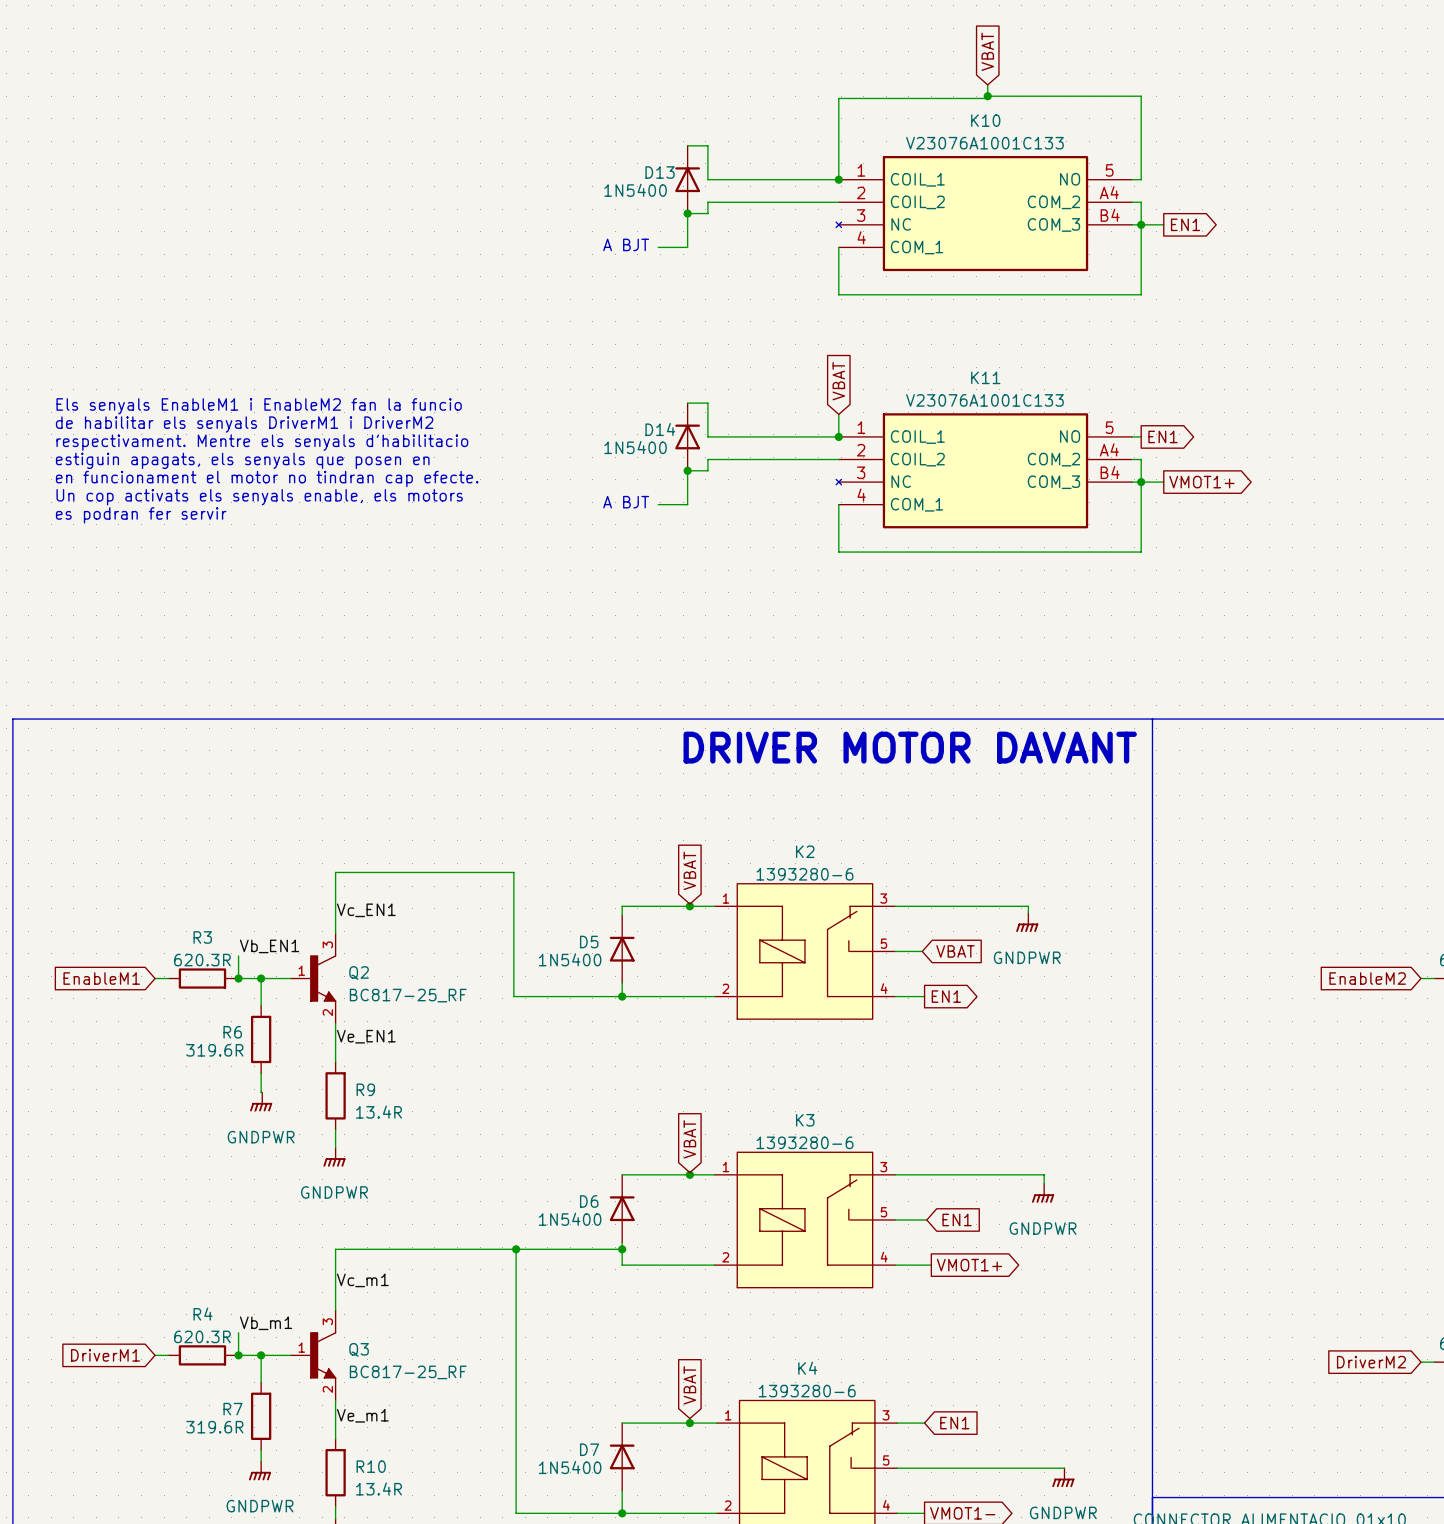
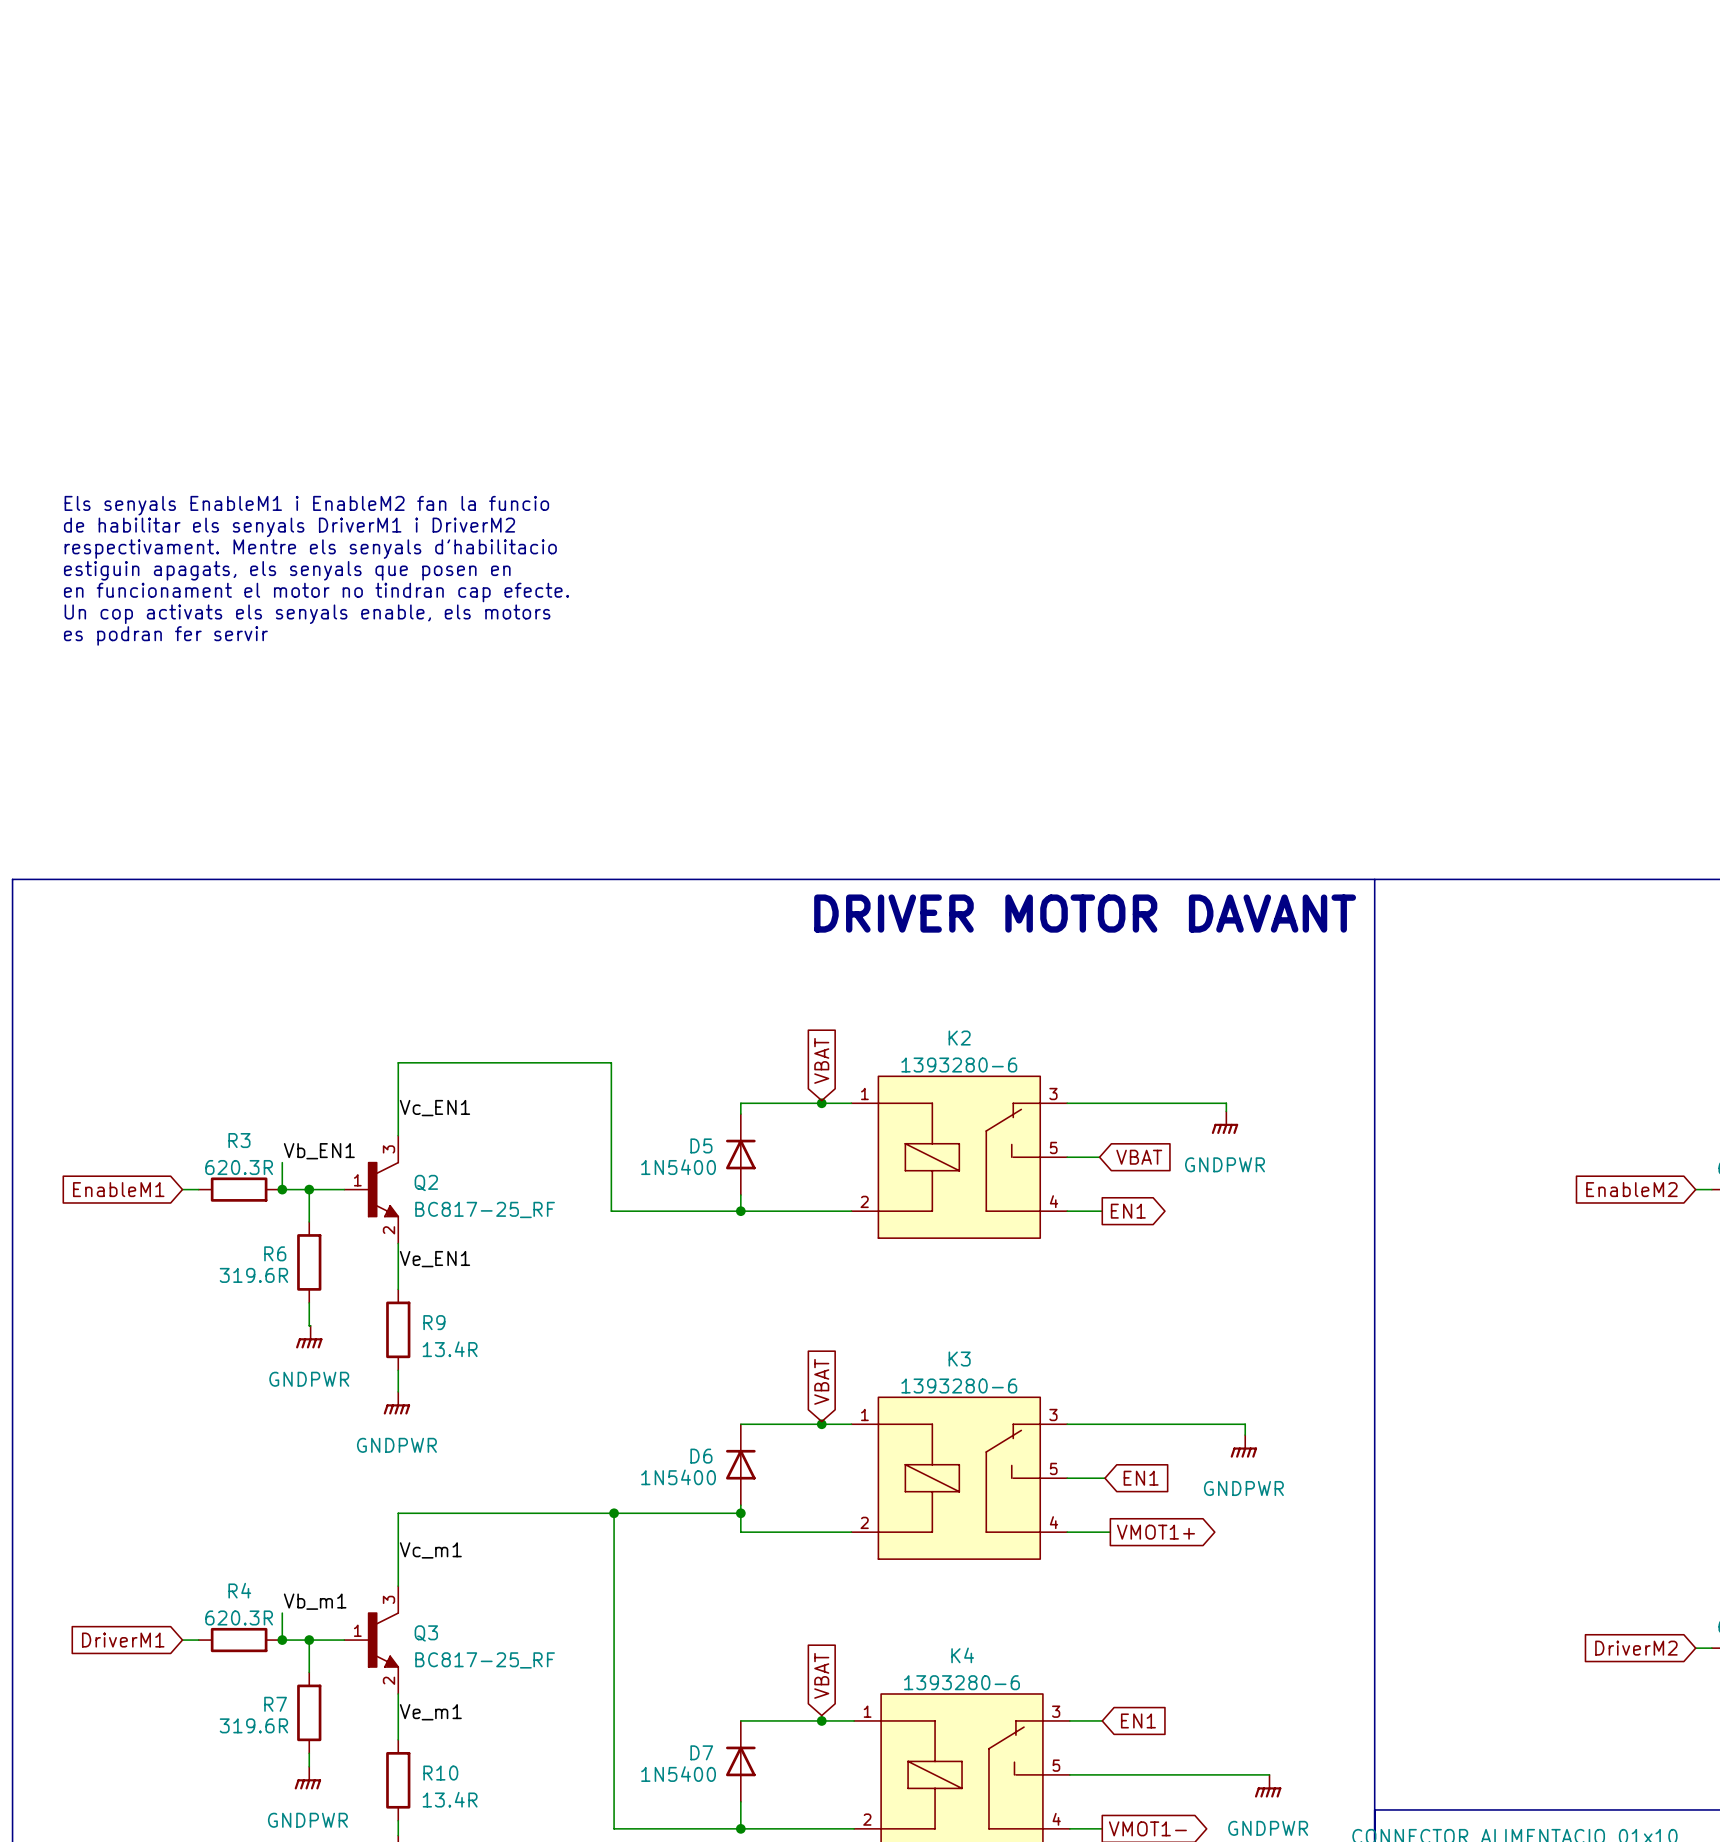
global label: VBAT (987, 51) -> none
wire: (987, 84) (987, 98) (838, 98) (838, 179) (707, 179) (707, 145) (687, 145) -> none
wire: (987, 96) (1141, 96) (1141, 179) (1132, 179) -> none
junction: (987, 96) -> none
D13: 1N5400 (687, 179) -> none
junction: (838, 179) -> none
wire: (838, 202) (707, 202) (707, 213) (687, 213) (687, 247) (658, 247) -> none
wire: (1132, 202) (1141, 202) (1141, 294) (838, 294) (838, 247) -> none
junction: (687, 213) -> none
K10: V23076A1001C133 (984, 213) -> none
wire: (1132, 224) (1163, 224) -> none
junction: (1141, 224) -> none
global label: EN1 (1185, 224) -> none
text: A BJT (626, 244) -> none
global label: VBAT (838, 381) -> none
wire: (687, 403) (707, 403) (707, 436) (838, 436) (838, 414) -> none
D14: 1N5400 (687, 436) -> none
junction: (838, 436) -> none
wire: (1132, 436) (1141, 436) -> none
global label: EN1 (1162, 436) -> none
wire: (838, 459) (707, 459) (707, 470) (687, 470) (687, 504) (658, 504) -> none
wire: (1132, 459) (1141, 459) (1141, 552) (838, 552) (838, 504) -> none
junction: (687, 470) -> none
K11: V23076A1001C133 (984, 470) -> none
wire: (1132, 482) (1163, 482) -> none
junction: (1141, 482) -> none
global label: VMOT1+ (1201, 482) -> none
text: A BJT (626, 502) -> none

